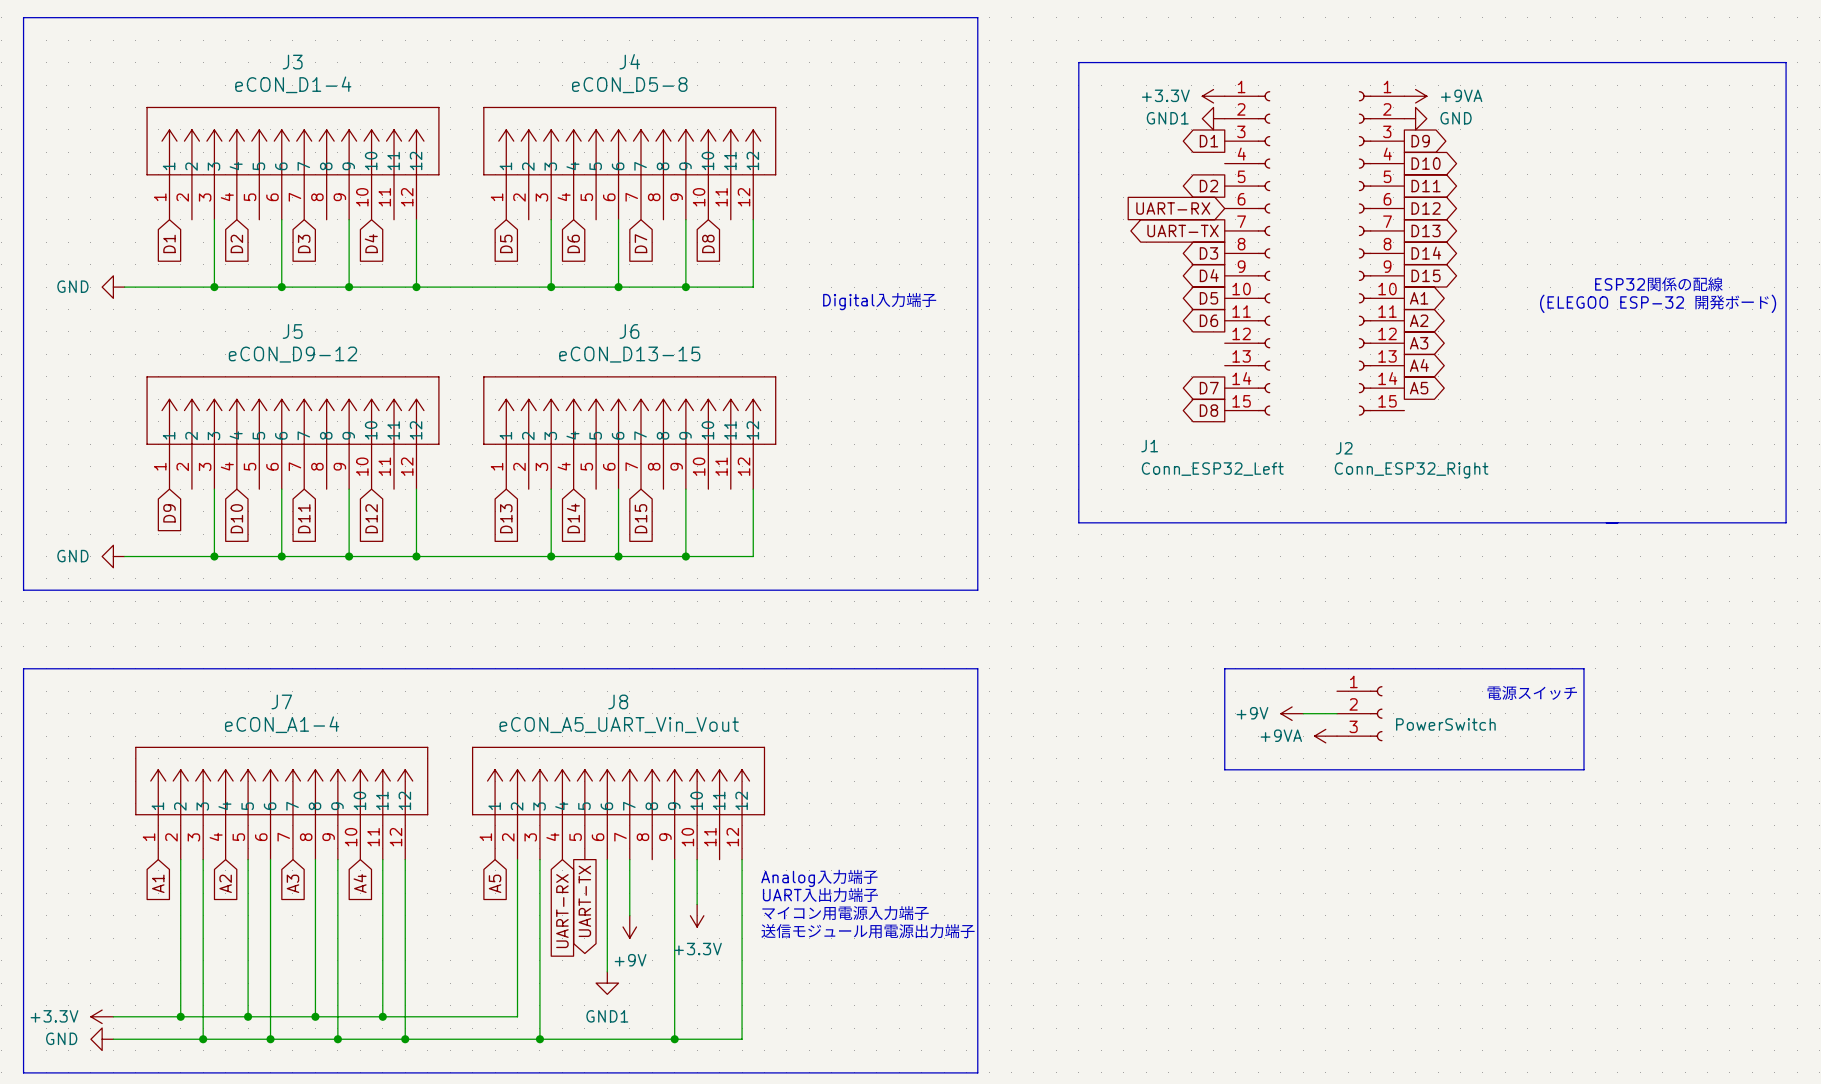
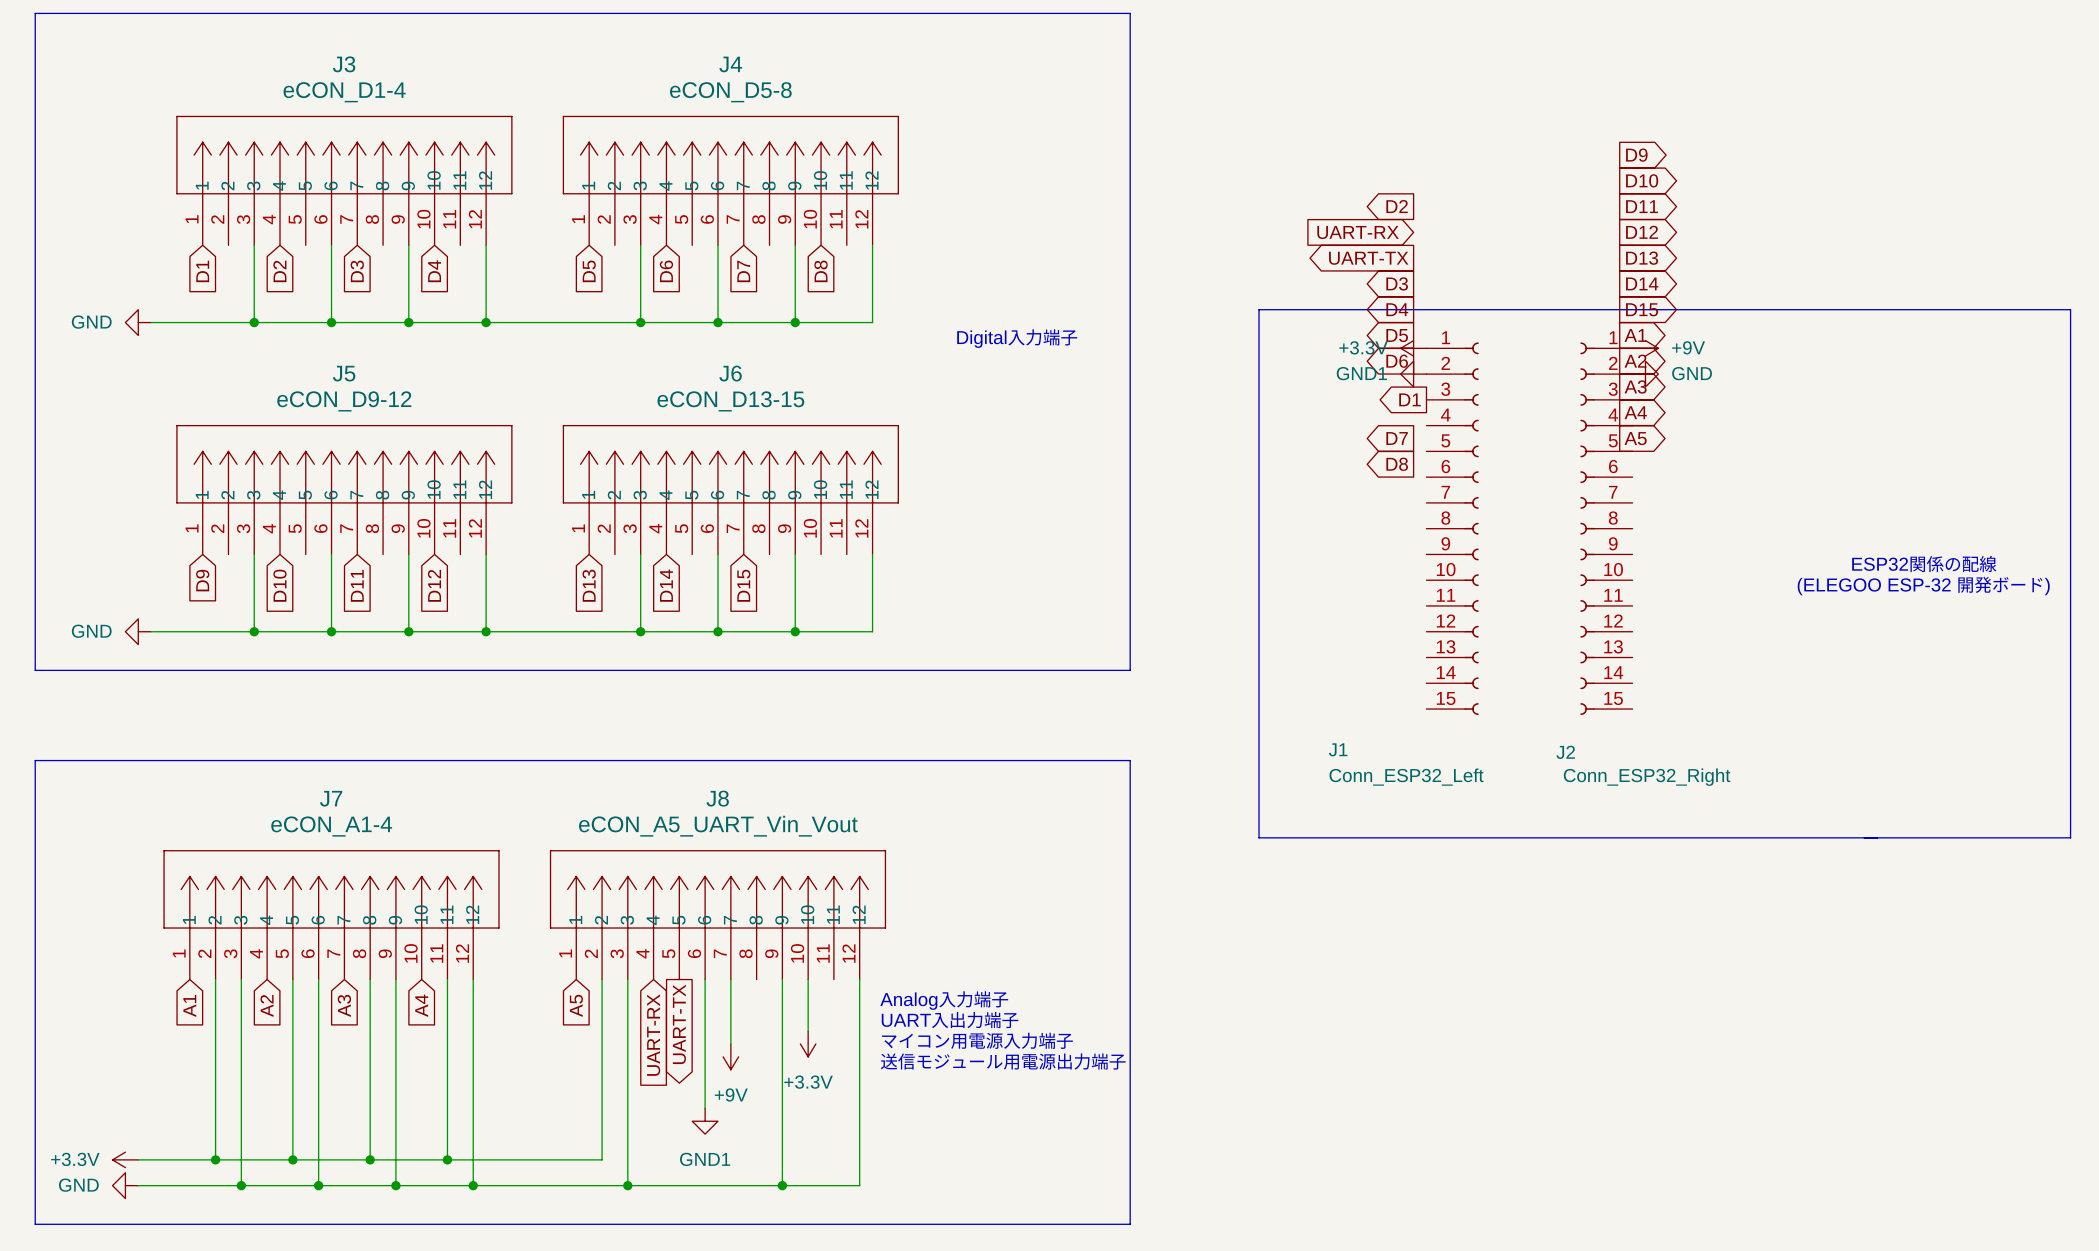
line: (1078, 62) (1786, 62) (1786, 522) (1078, 522) (1078, 62) -> (1259, 309) (2070, 309) (2070, 837) (1259, 837) (1259, 309)
power symbol position: +3.3V (1213, 96) -> +3.3V (1413, 348)
power symbol: +9VA (1415, 96) -> none
power symbol position: GND1 (1213, 118) -> GND1 (1413, 374)
power symbol position: GND (1415, 118) -> GND (1645, 374)
global label position: D1 (1208, 141) -> D1 (1409, 399)
J1 position: (1247, 253) -> (1452, 528)
J2 position: (1381, 253) -> (1606, 528)
text position: ESP32関係の配線 (1659, 284) -> ESP32関係の配線 (1924, 564)
text position: (ELEGOO ESP-32 開発ボード) (1658, 303) -> (ELEGOO ESP-32 開発ボード) (1923, 586)
power symbol: none -> +9V (1645, 348)
line: (1224, 668) (1583, 668) (1583, 769) (1224, 769) (1224, 668) -> none
text: 電源スイッチ (1532, 692) -> none
power symbol: +9V (1292, 713) -> none
wire: (1303, 713) (1337, 713) -> none
part: PowerSwitch (1359, 713) -> none
power symbol: +9VA (1325, 736) -> none

